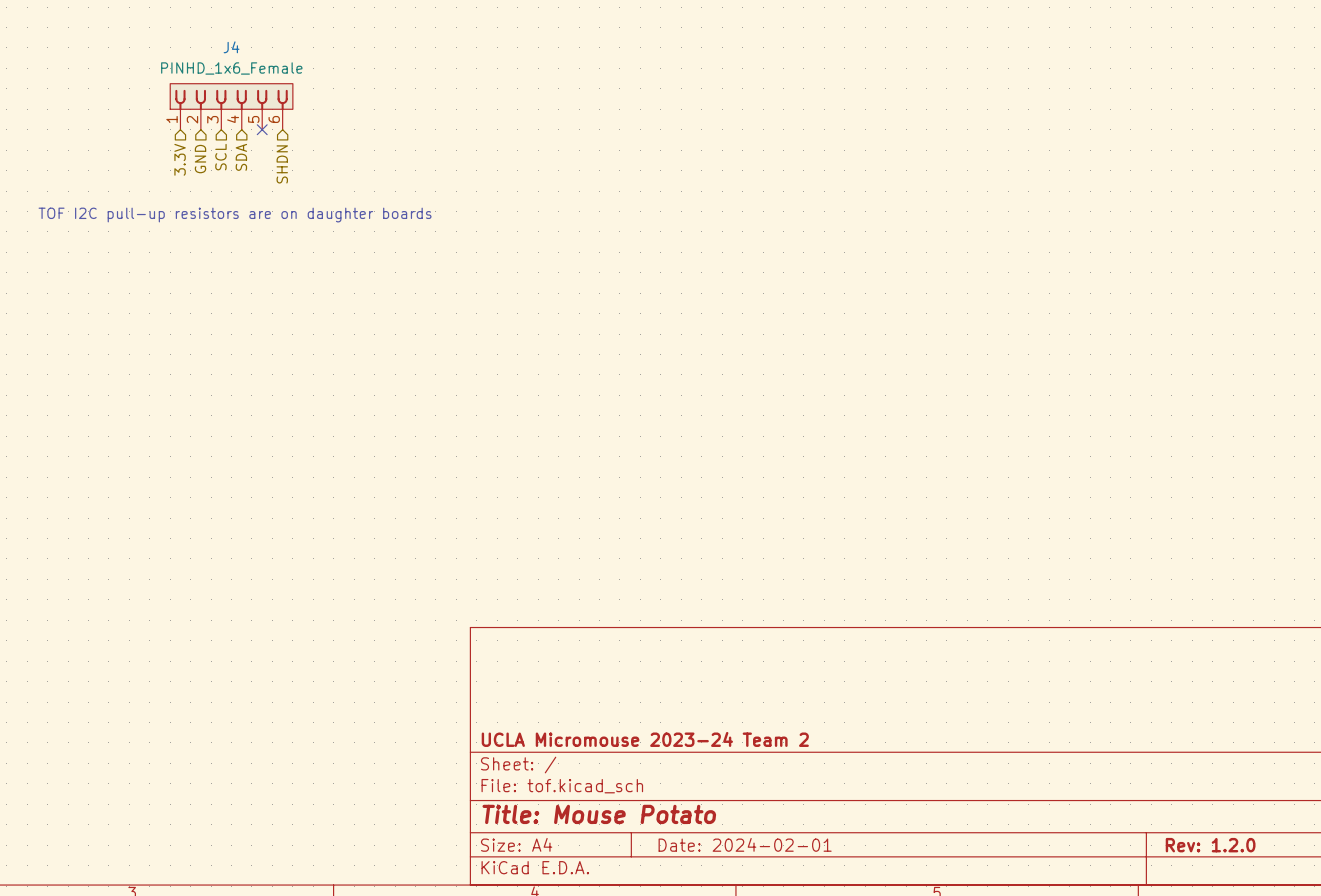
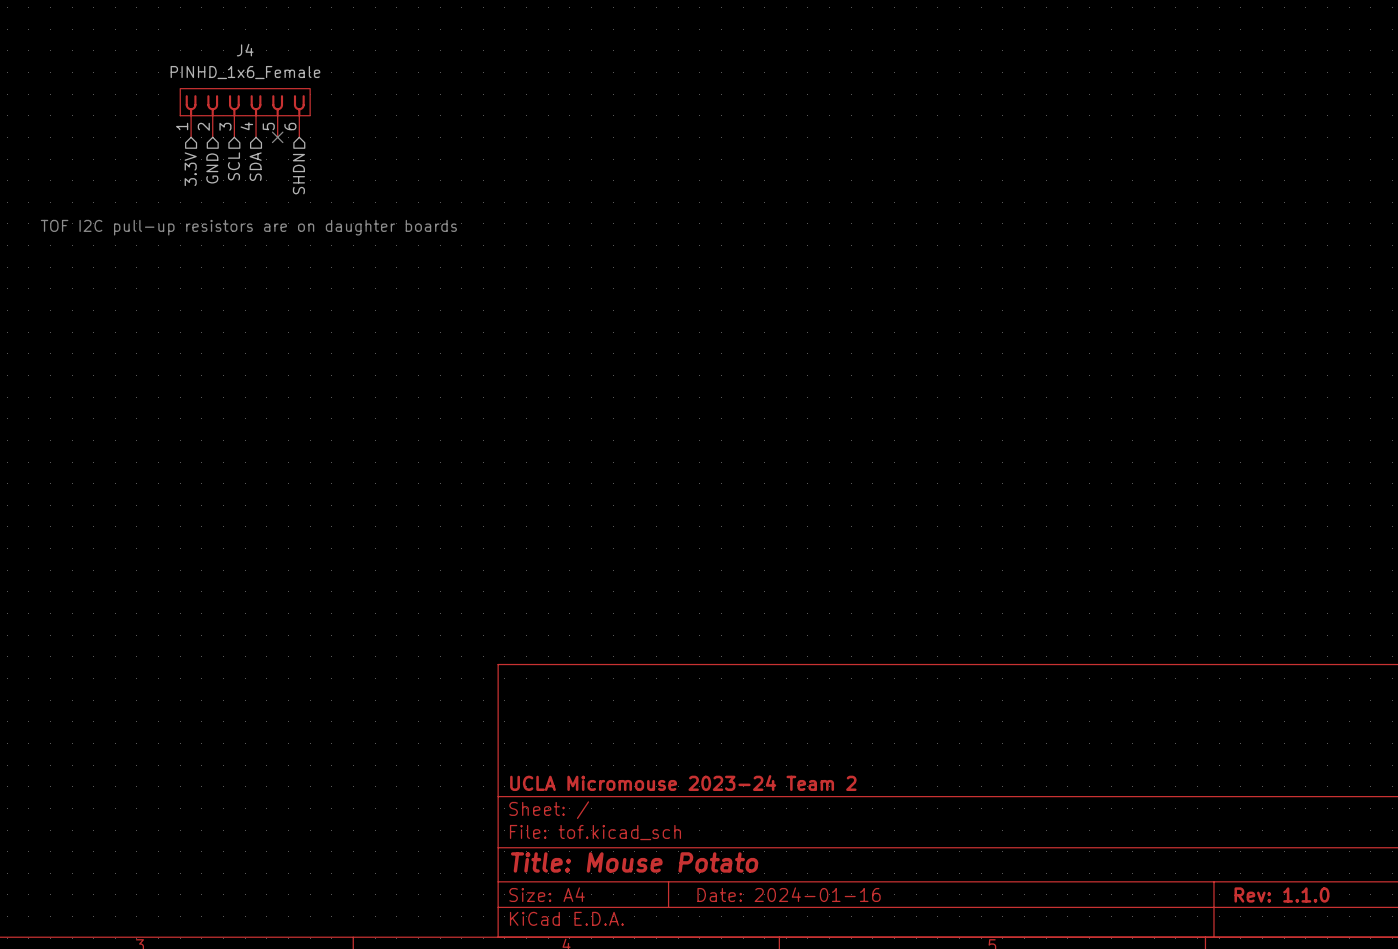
title block: Date: 2024-02-01 (745, 844) -> Date: 2024-01-16 (789, 894)
title block: Rev: 1.2.0 (1210, 845) -> Rev: 1.1.0 (1282, 894)

